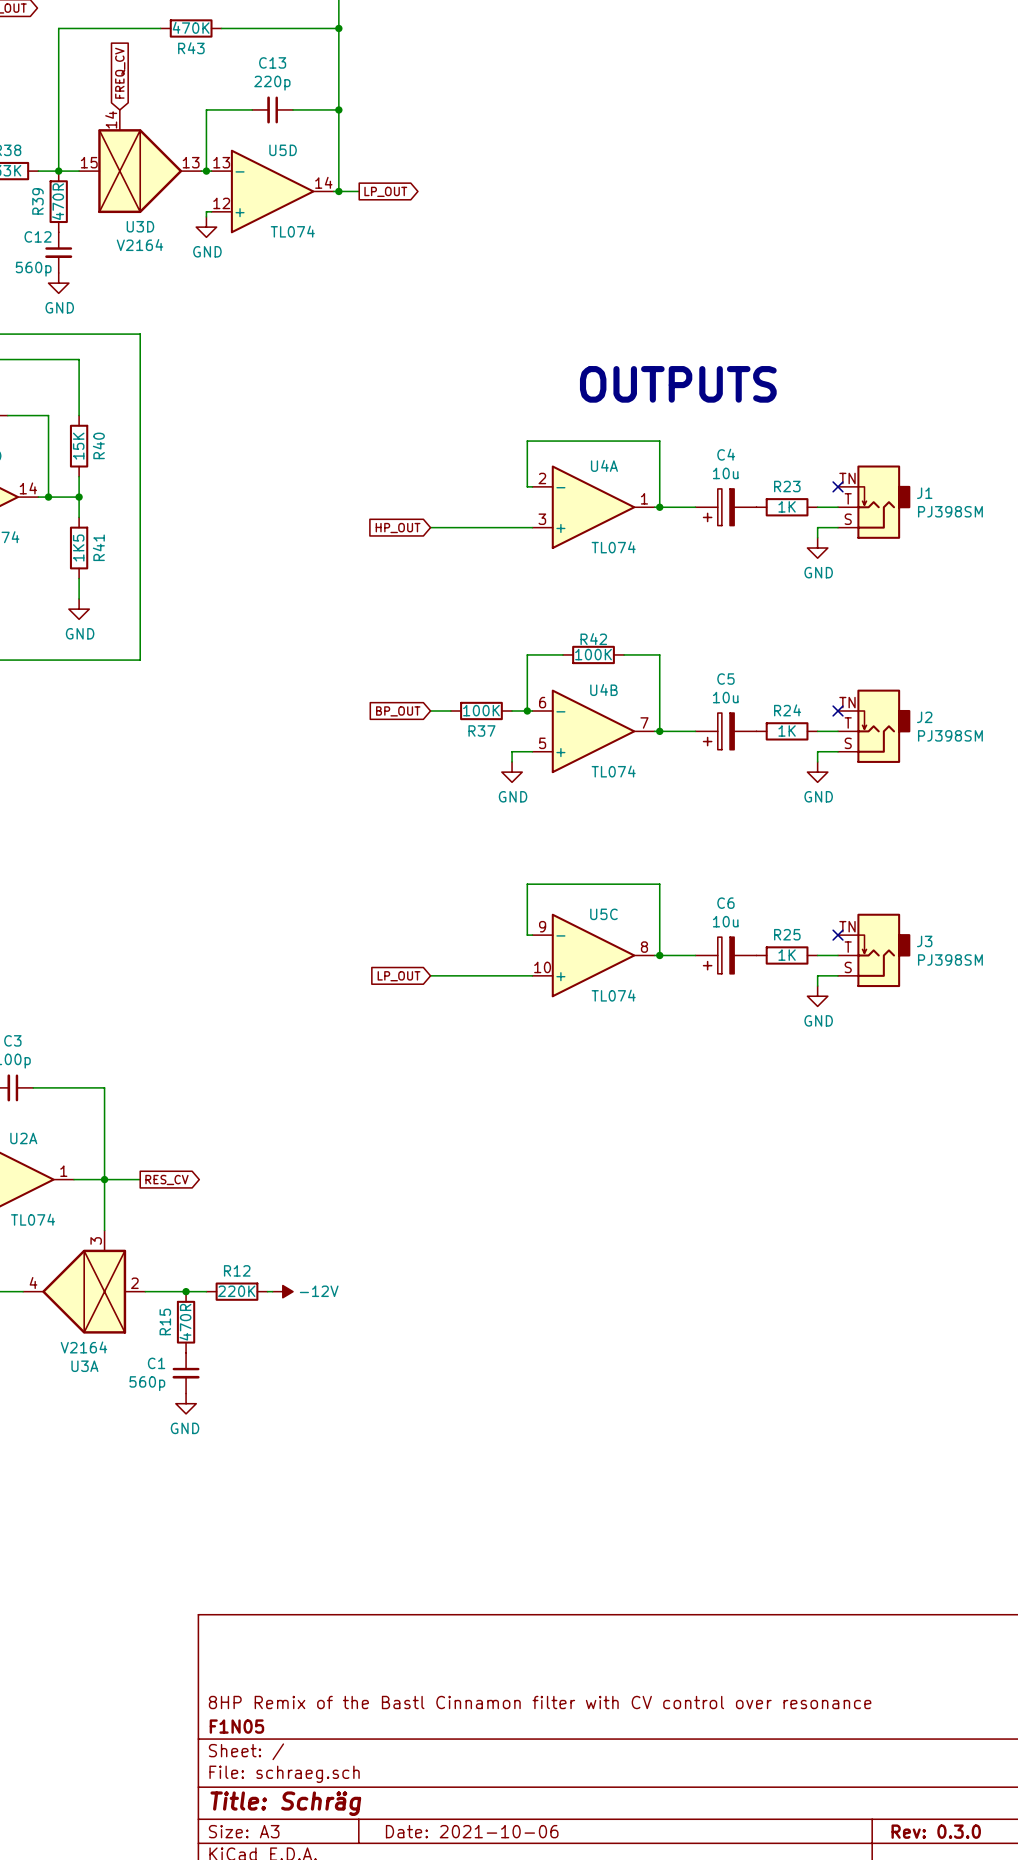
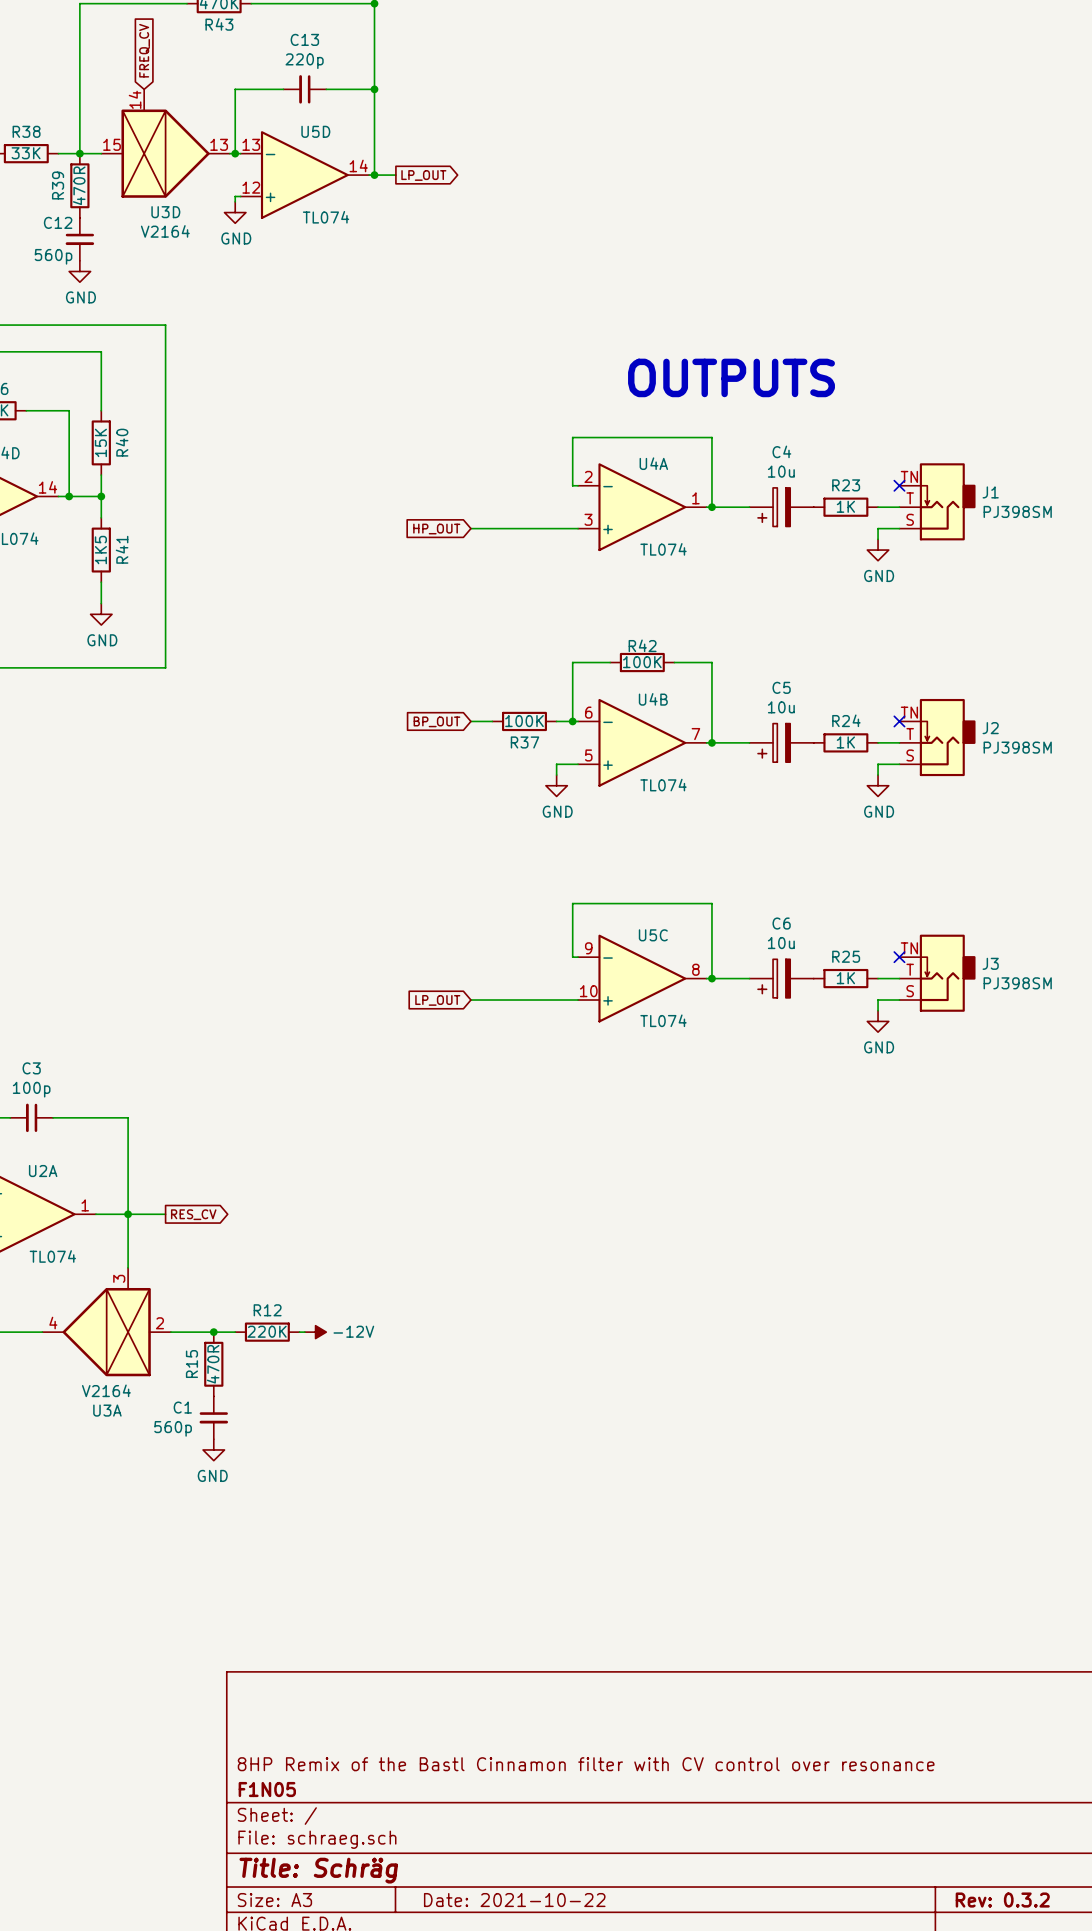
title block: Date: 2021-10-06 (472, 1831) -> Date: 2021-10-22 (514, 1900)
title block: Rev: 0.3.0 (936, 1831) -> Rev: 0.3.2 (1002, 1900)

